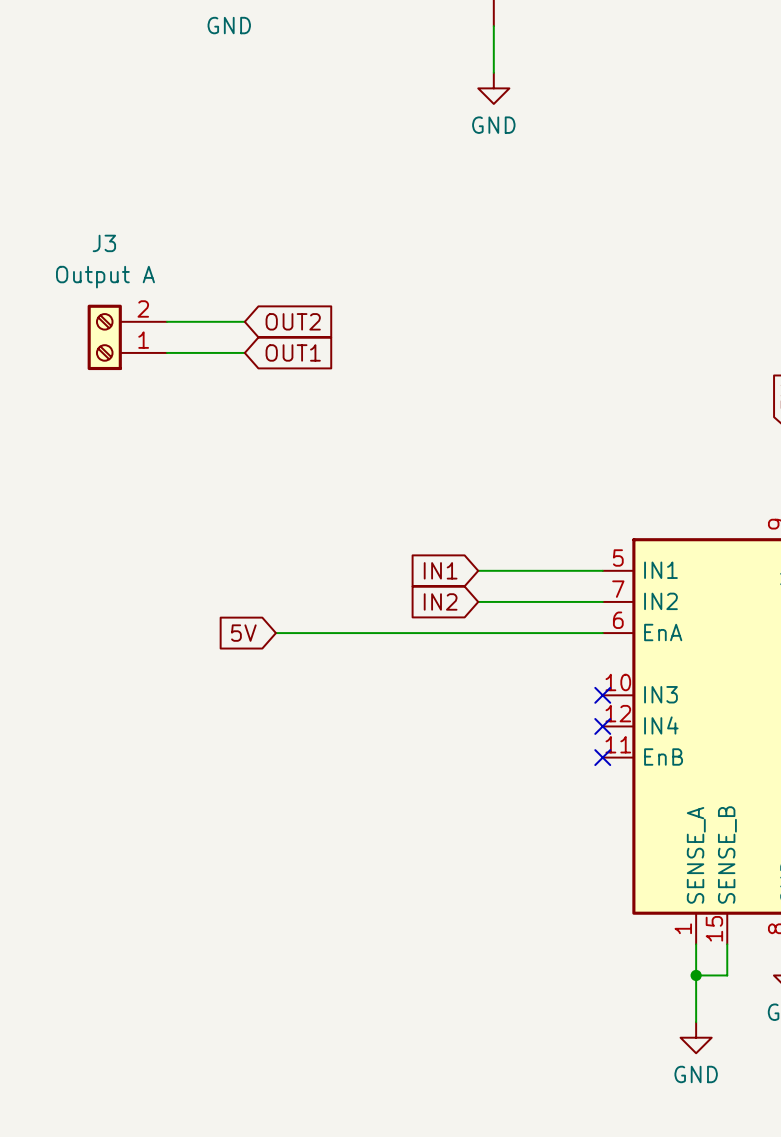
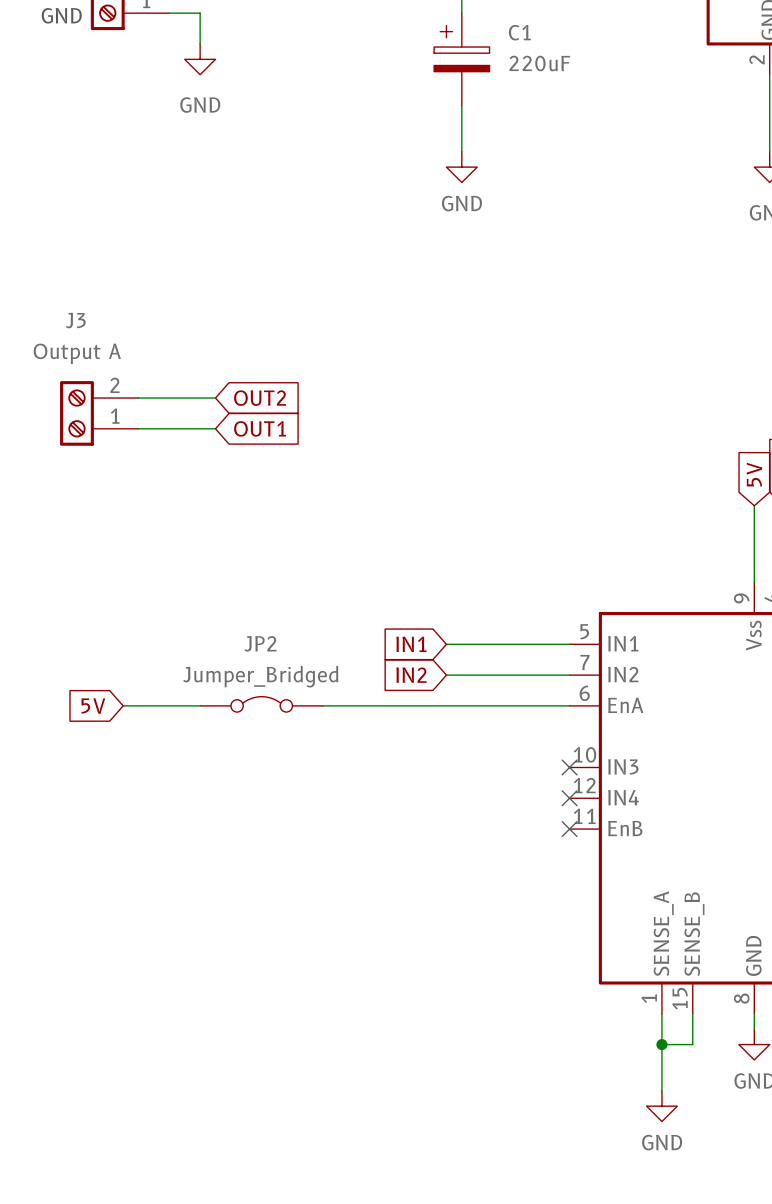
JP2: none -> Jumper_Bridged (261, 704)
global label position: 5V (243, 633) -> 5V (93, 706)
wire: (275, 633) (353, 633) -> (123, 705) (200, 705)

